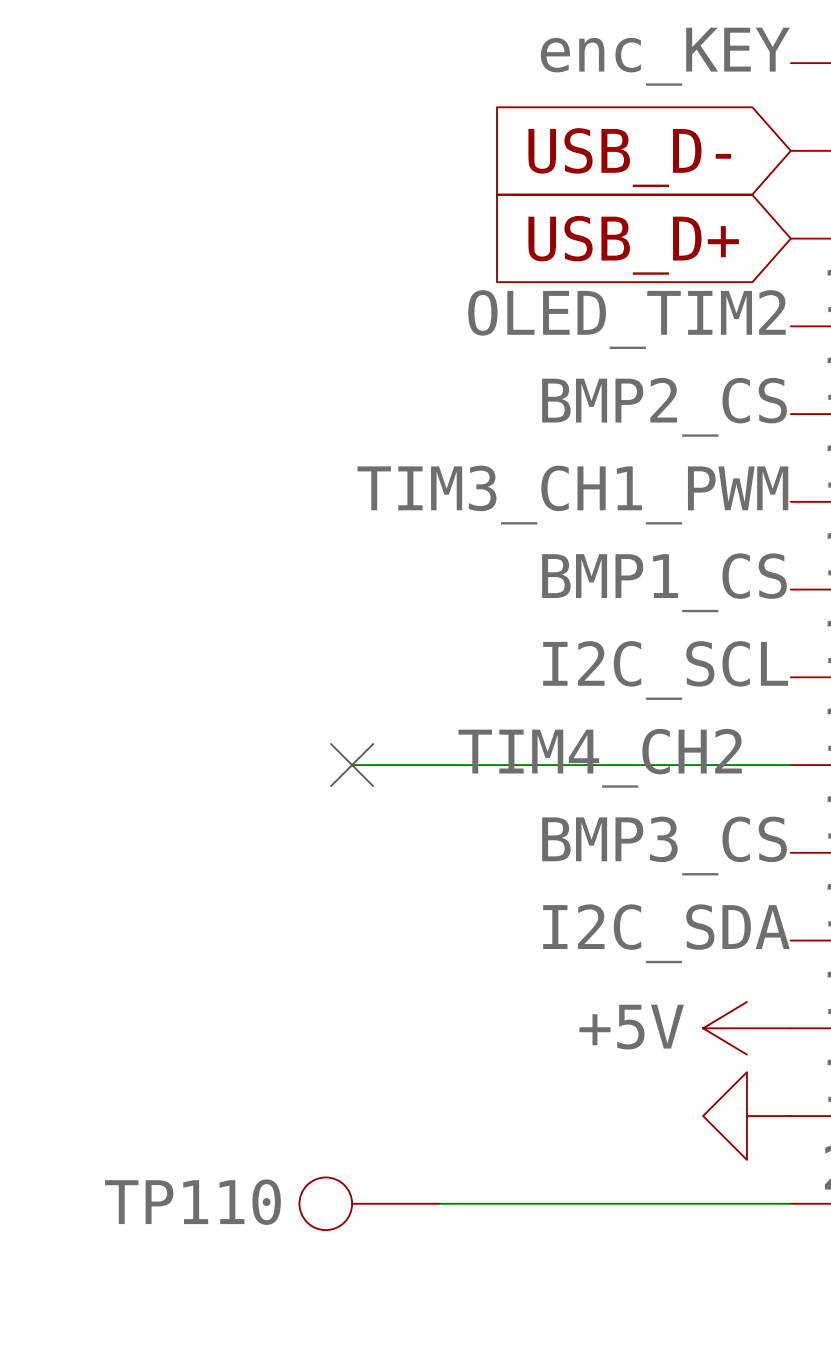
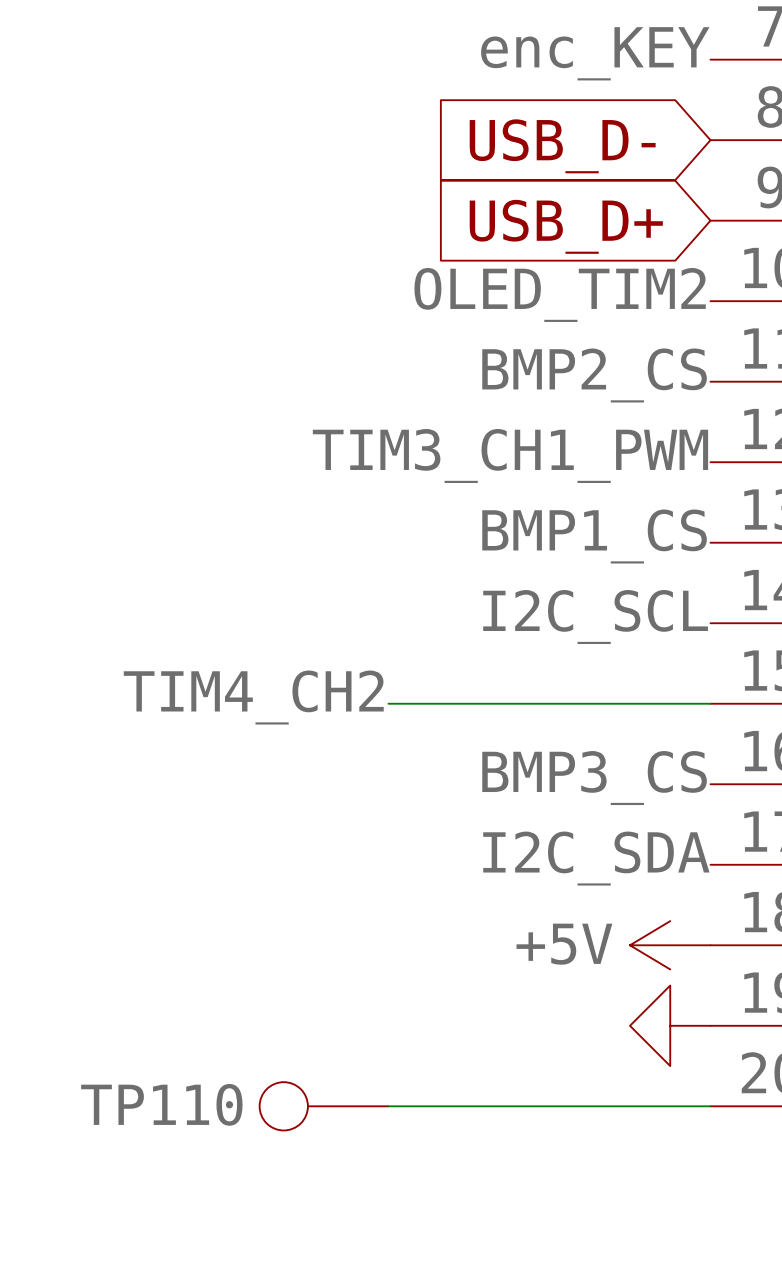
label position: TIM4_CH2 (600, 758) -> TIM4_CH2 (253, 697)
wire: (352, 765) (439, 765) -> none
no-connect mark: (352, 765) -> none

